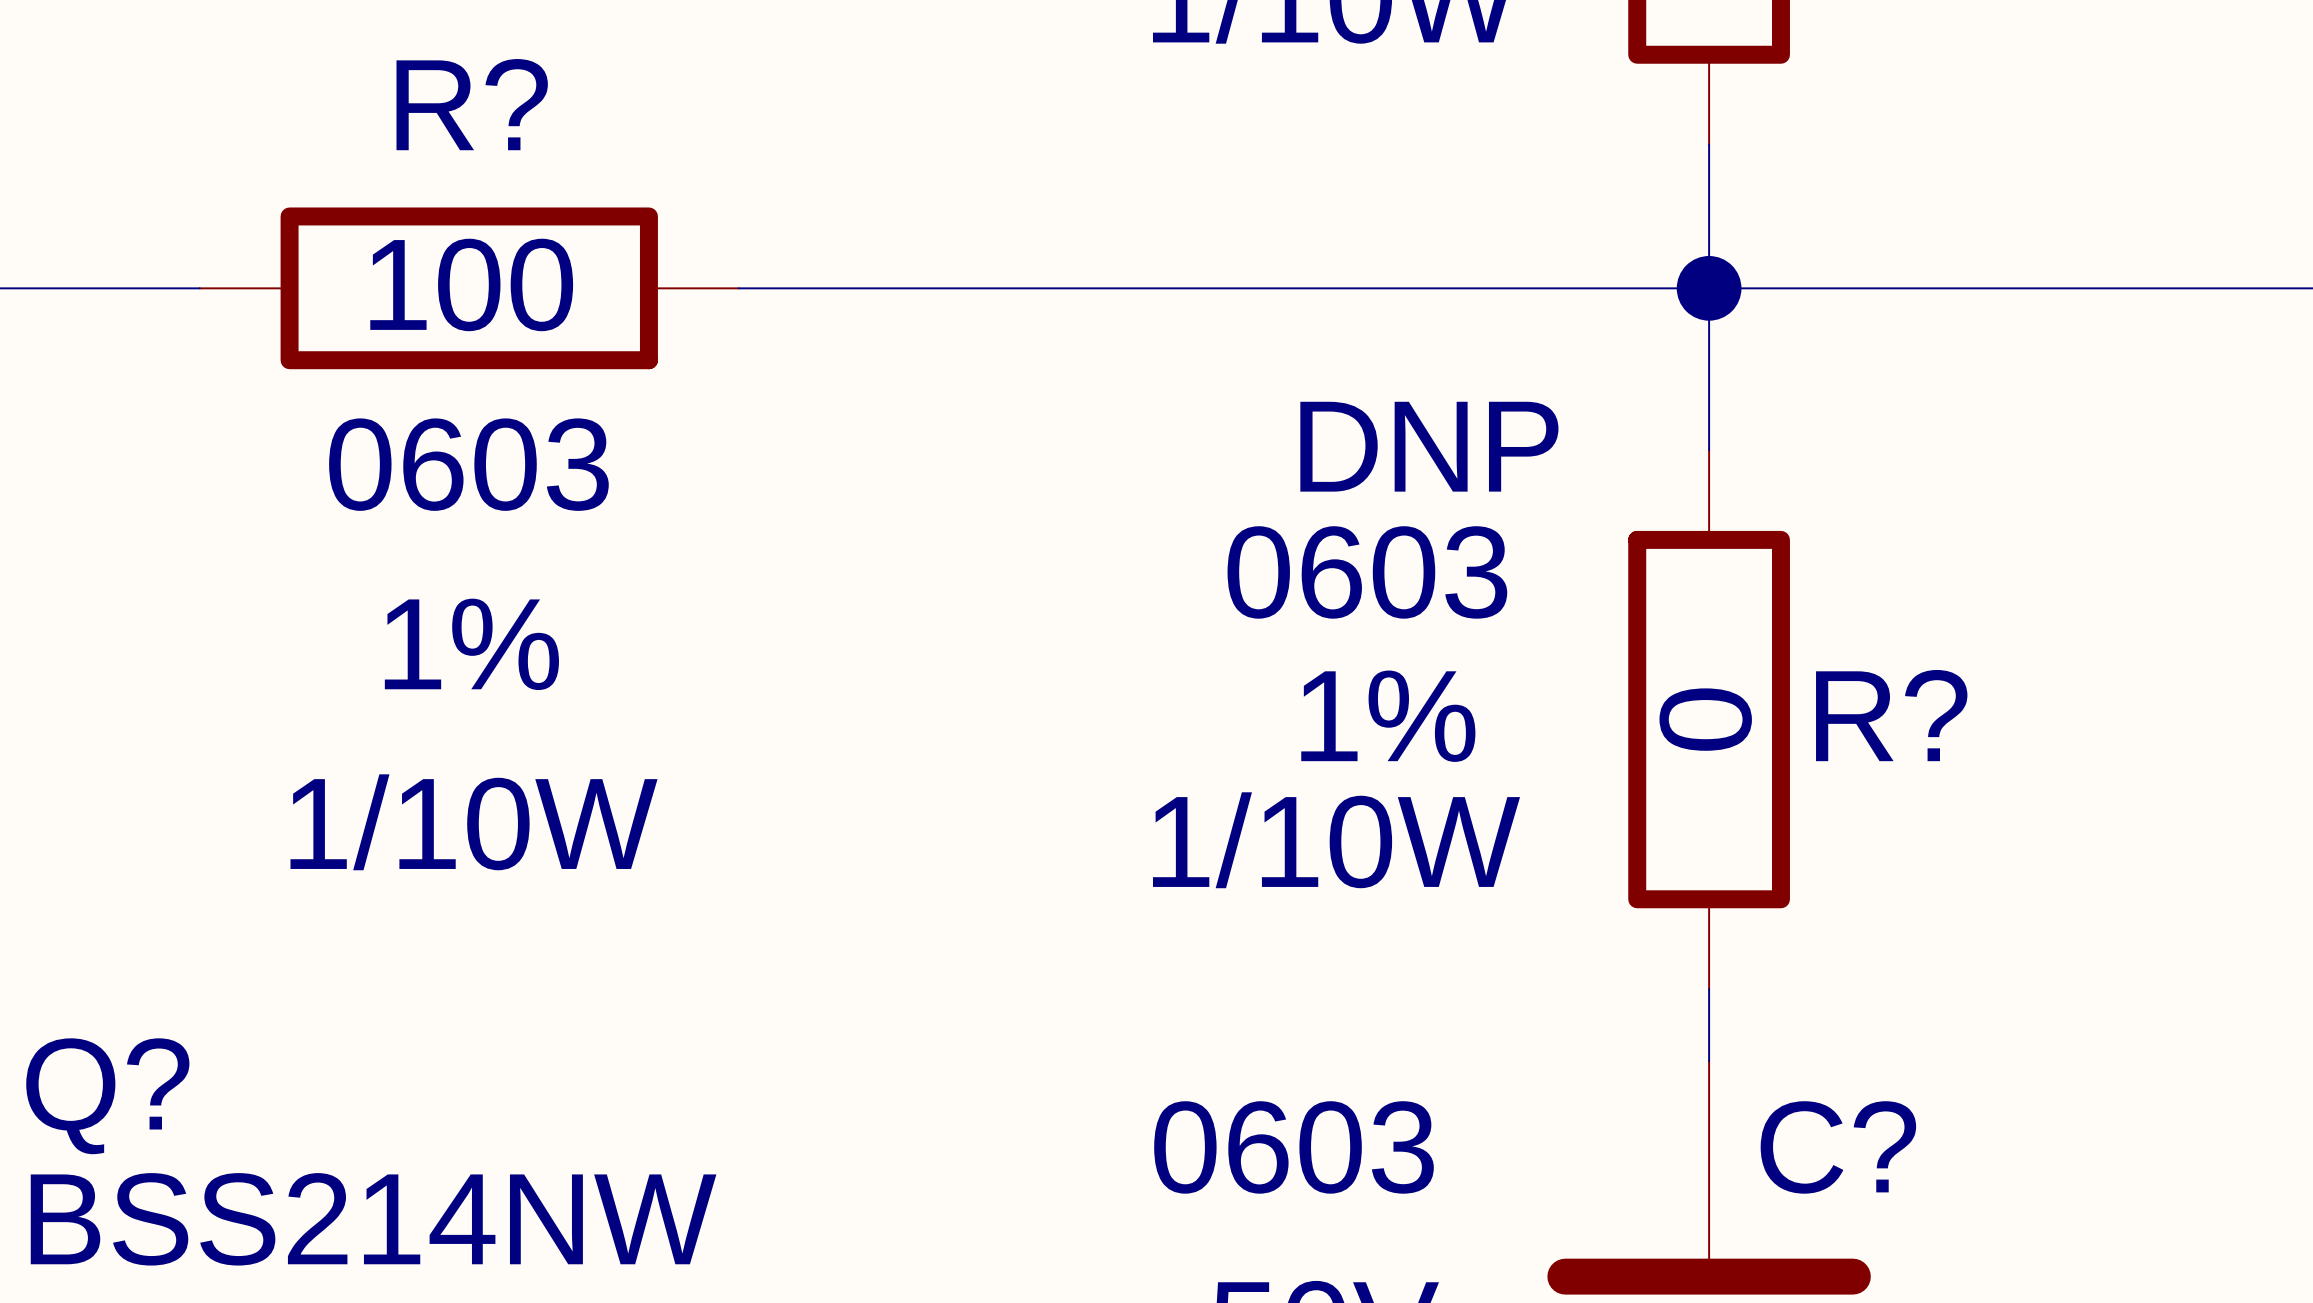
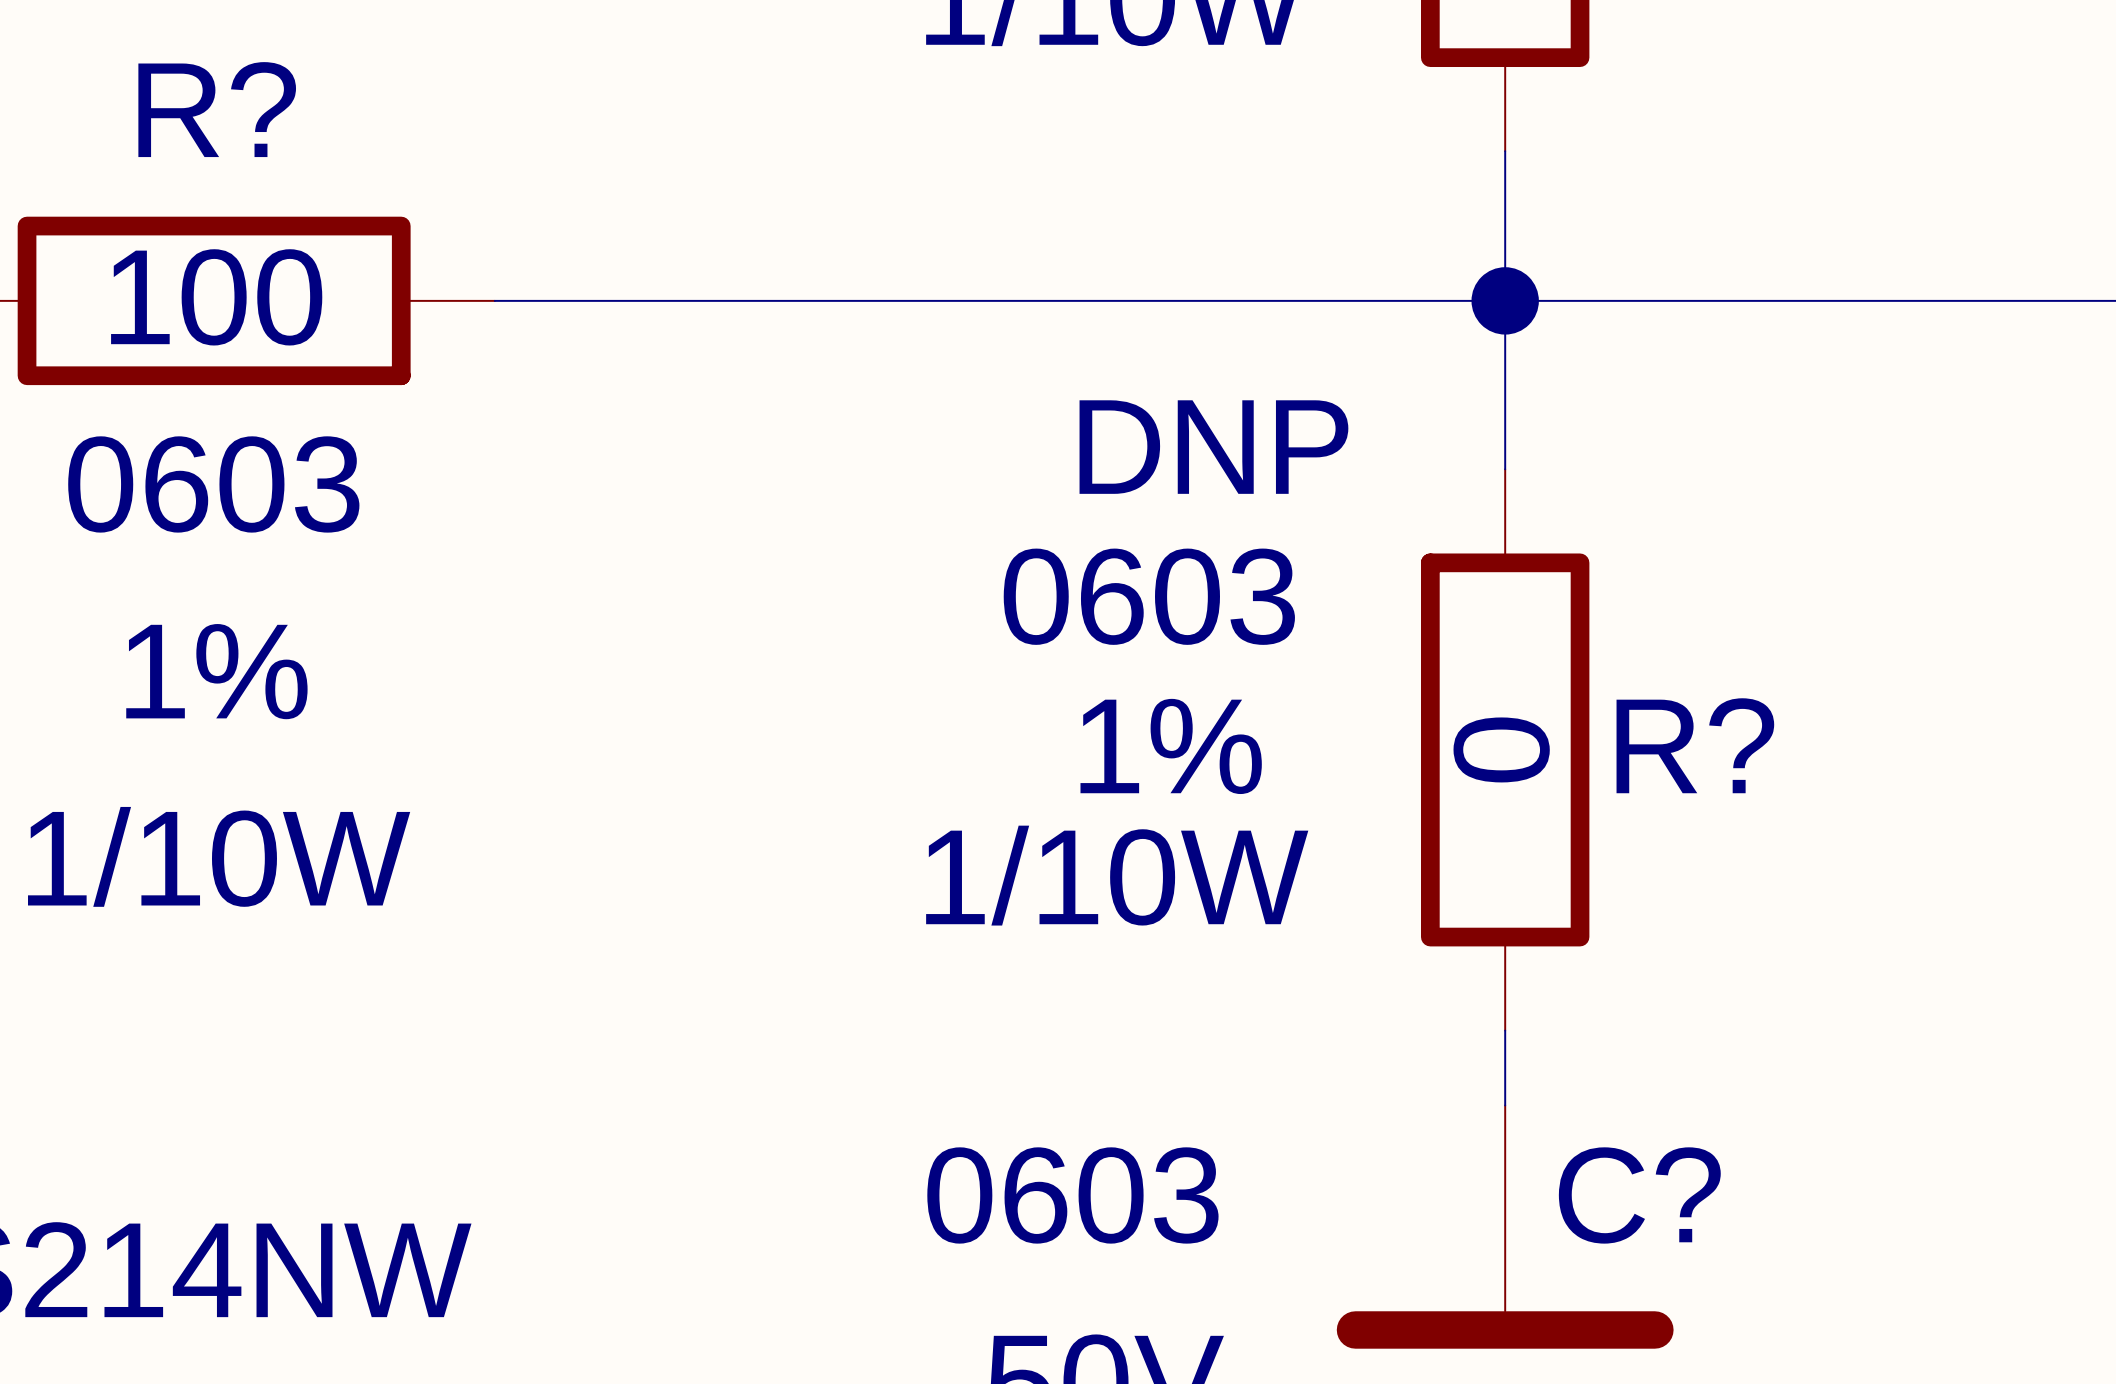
R? text position: DNP (1429, 446) -> DNP (1213, 447)

